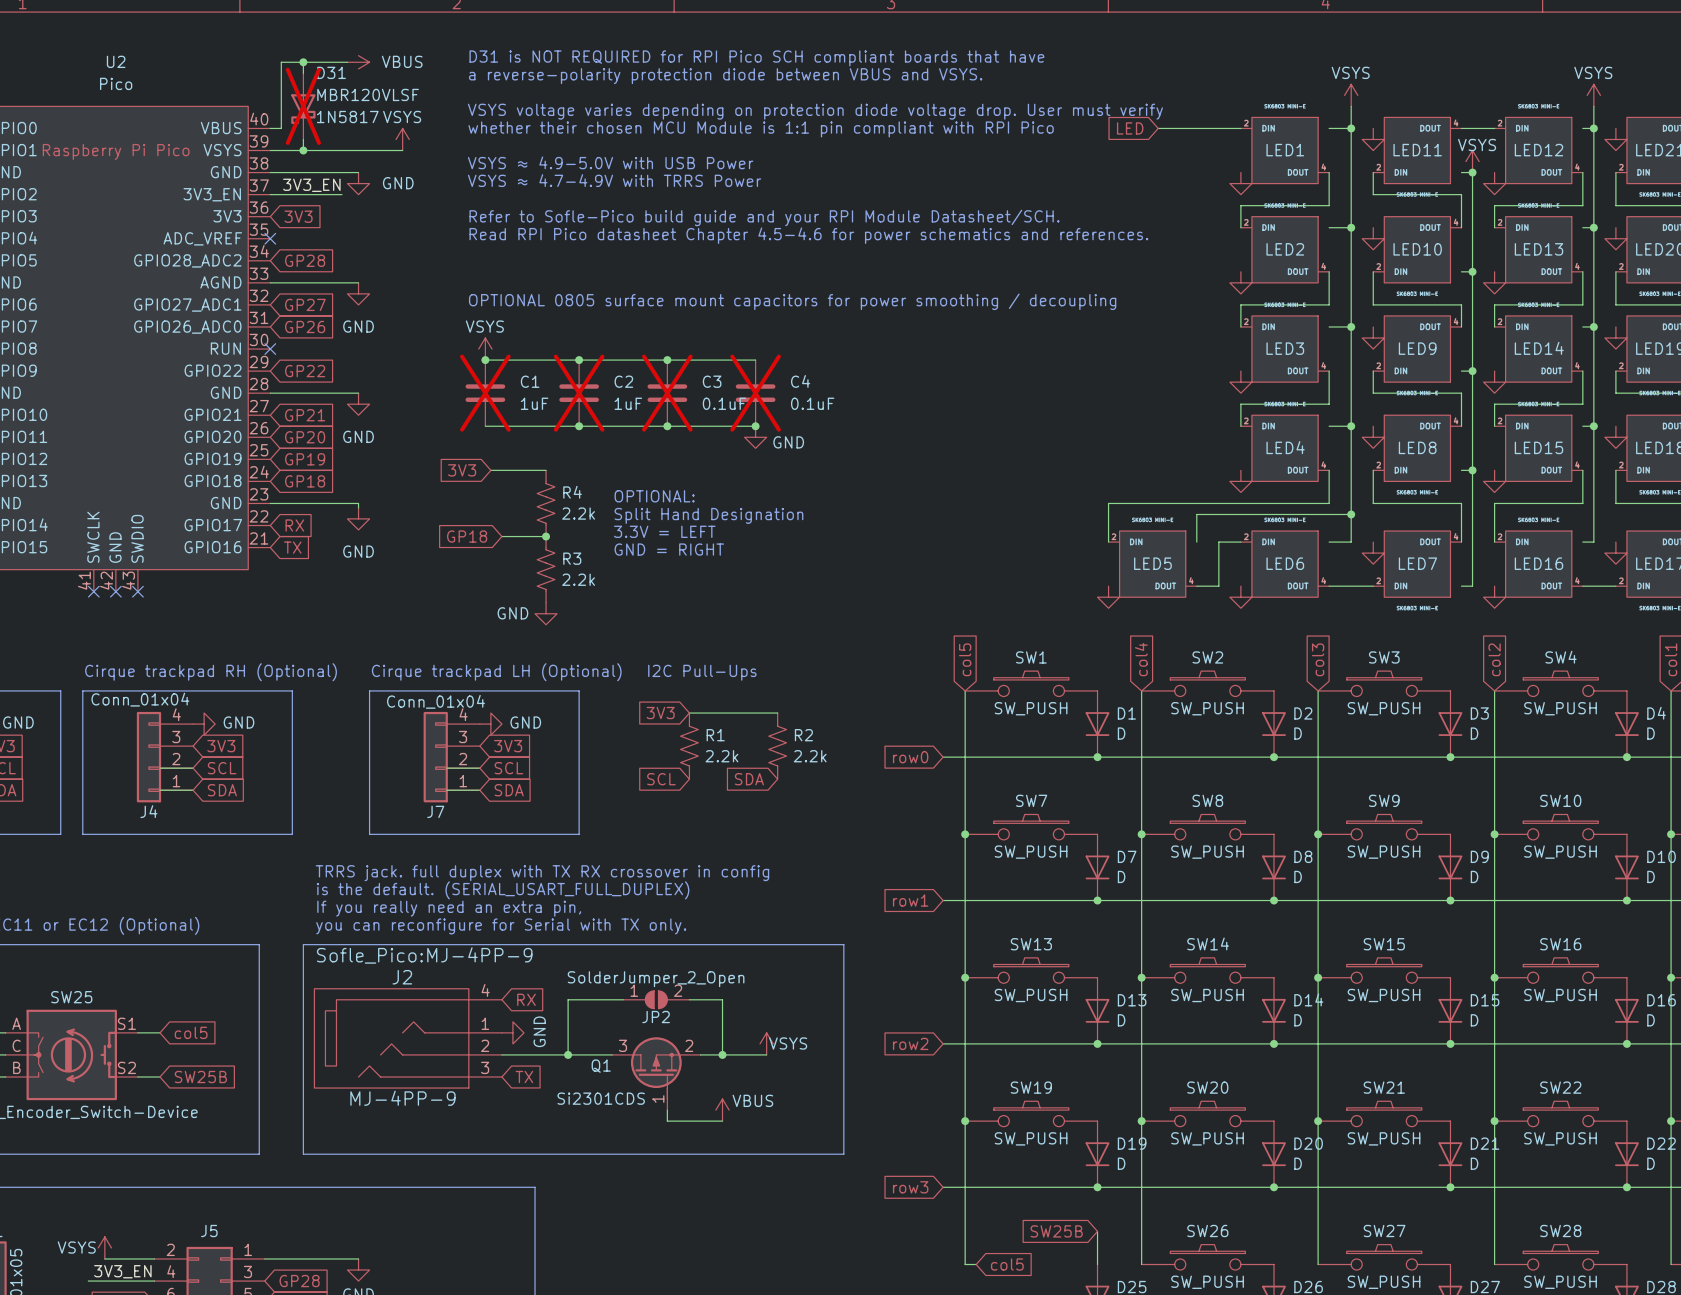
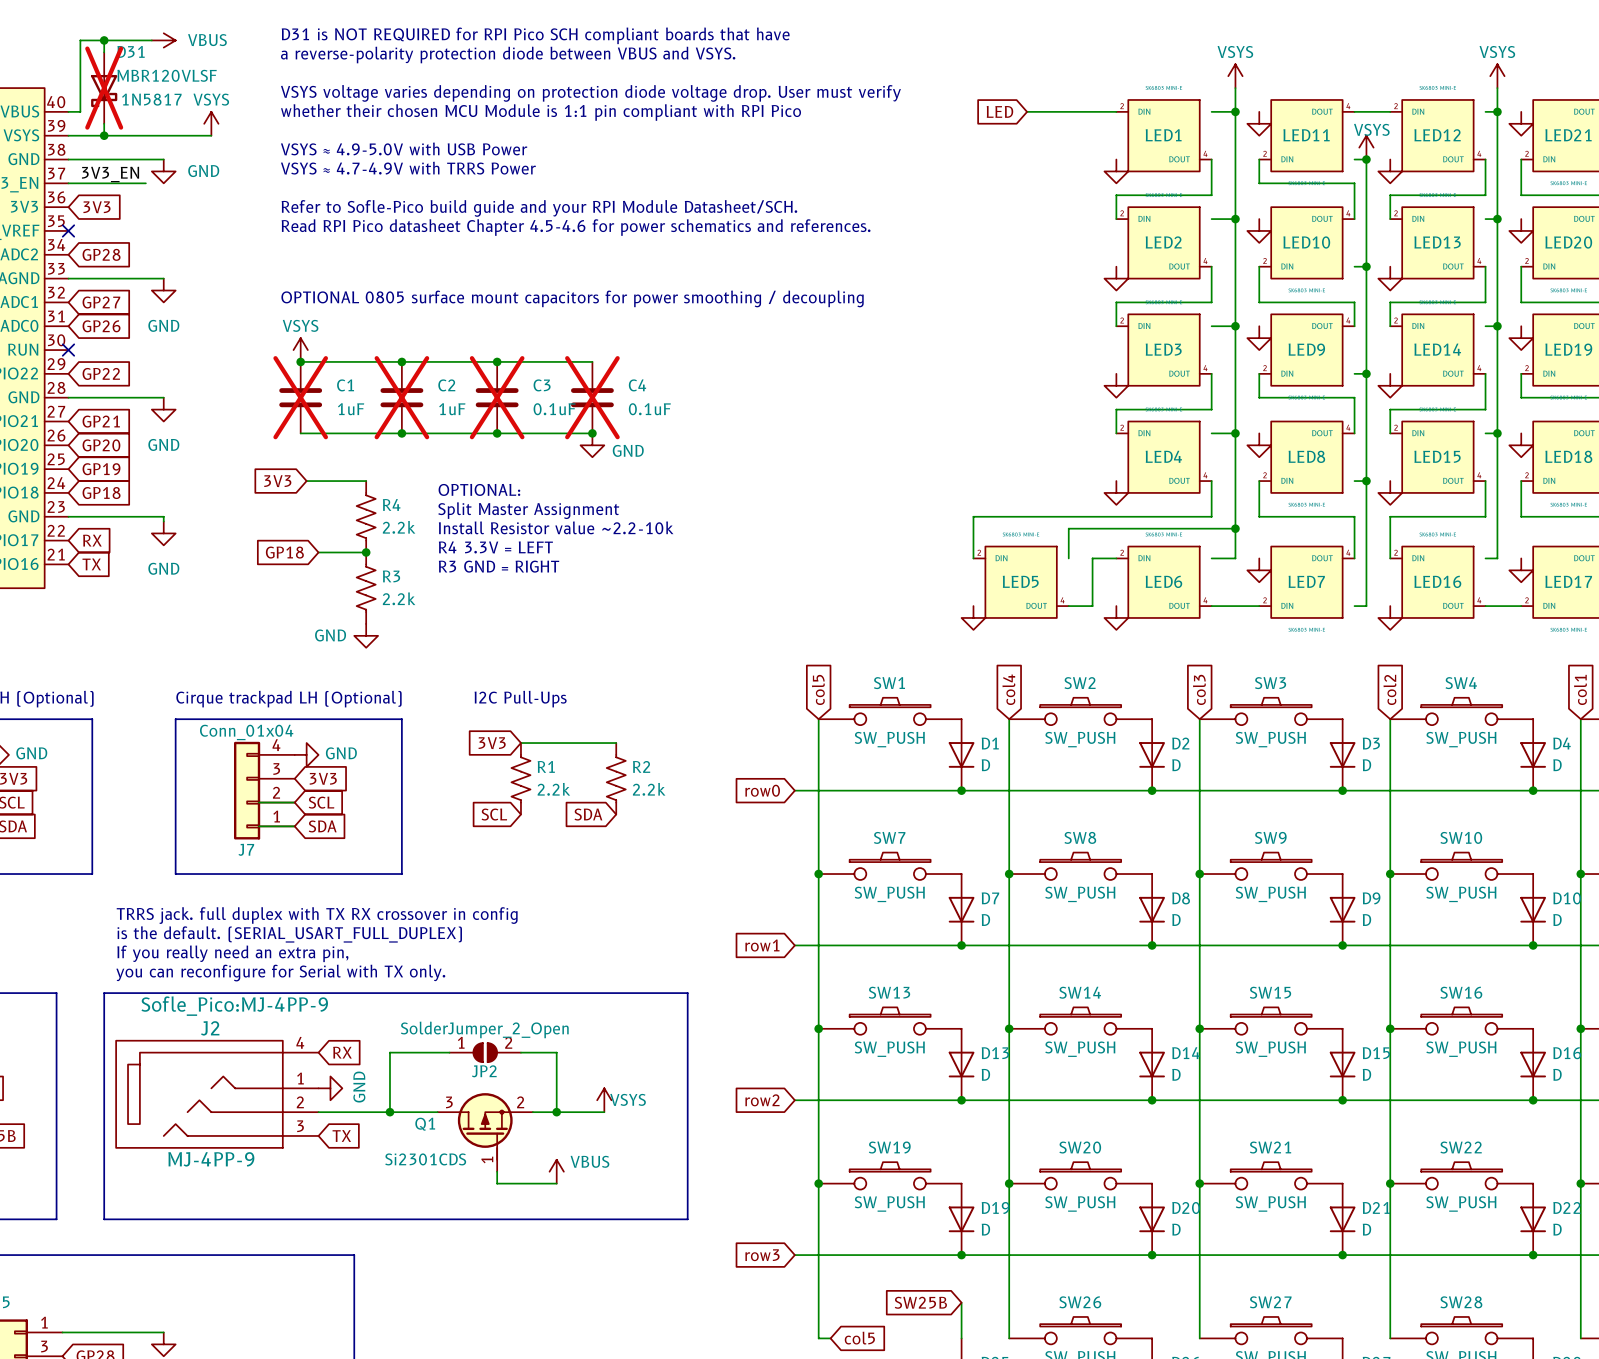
text: none -> OPTIONAL: (479, 489)
text: OPTIONAL: (654, 496) -> Split Master Assignment (528, 510)
text: Split Hand Designation (708, 515) -> Install Resistor value ~2.2-10k (556, 527)
text: 3.3V = LEFT (664, 531) -> R4 3.3V = LEFT (495, 547)
text: GND = RIGHT (669, 549) -> R3 GND = RIGHT (499, 566)

